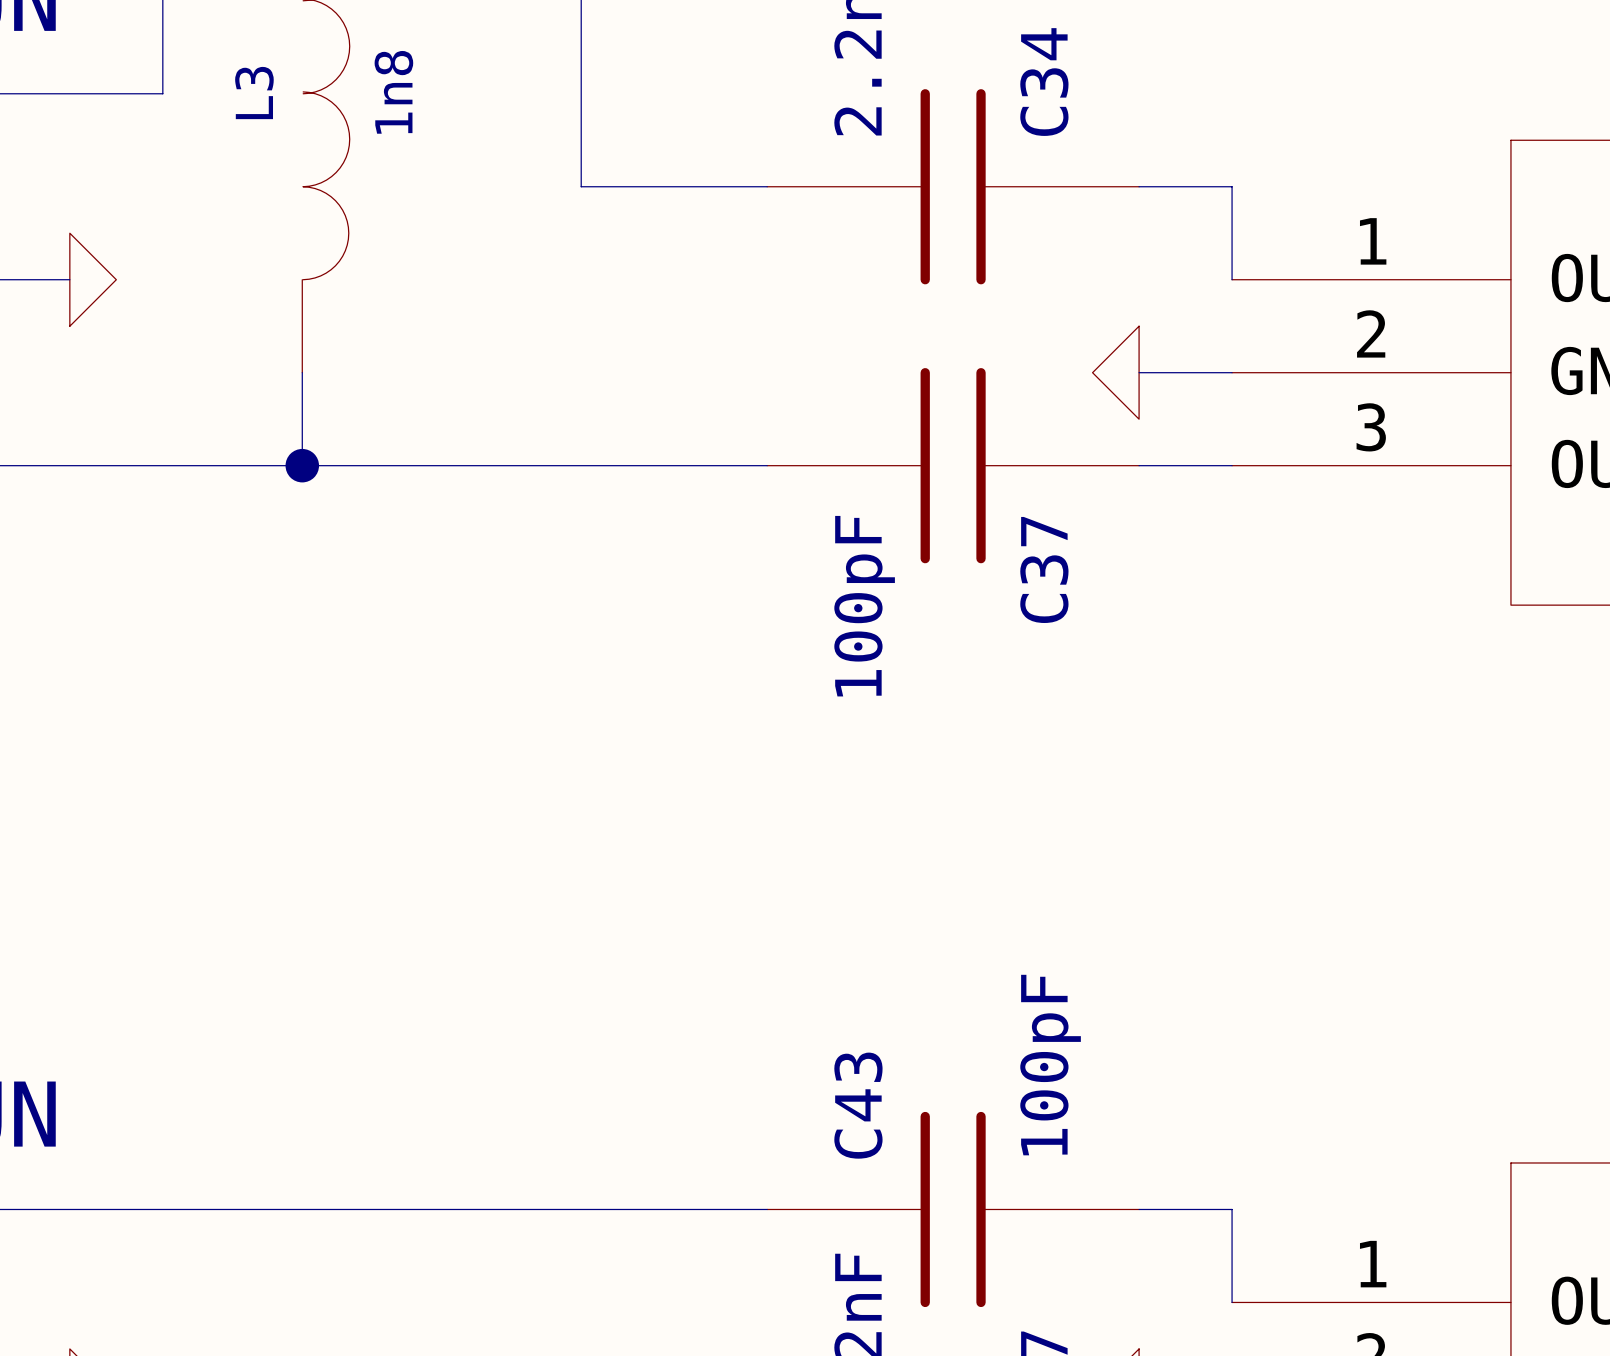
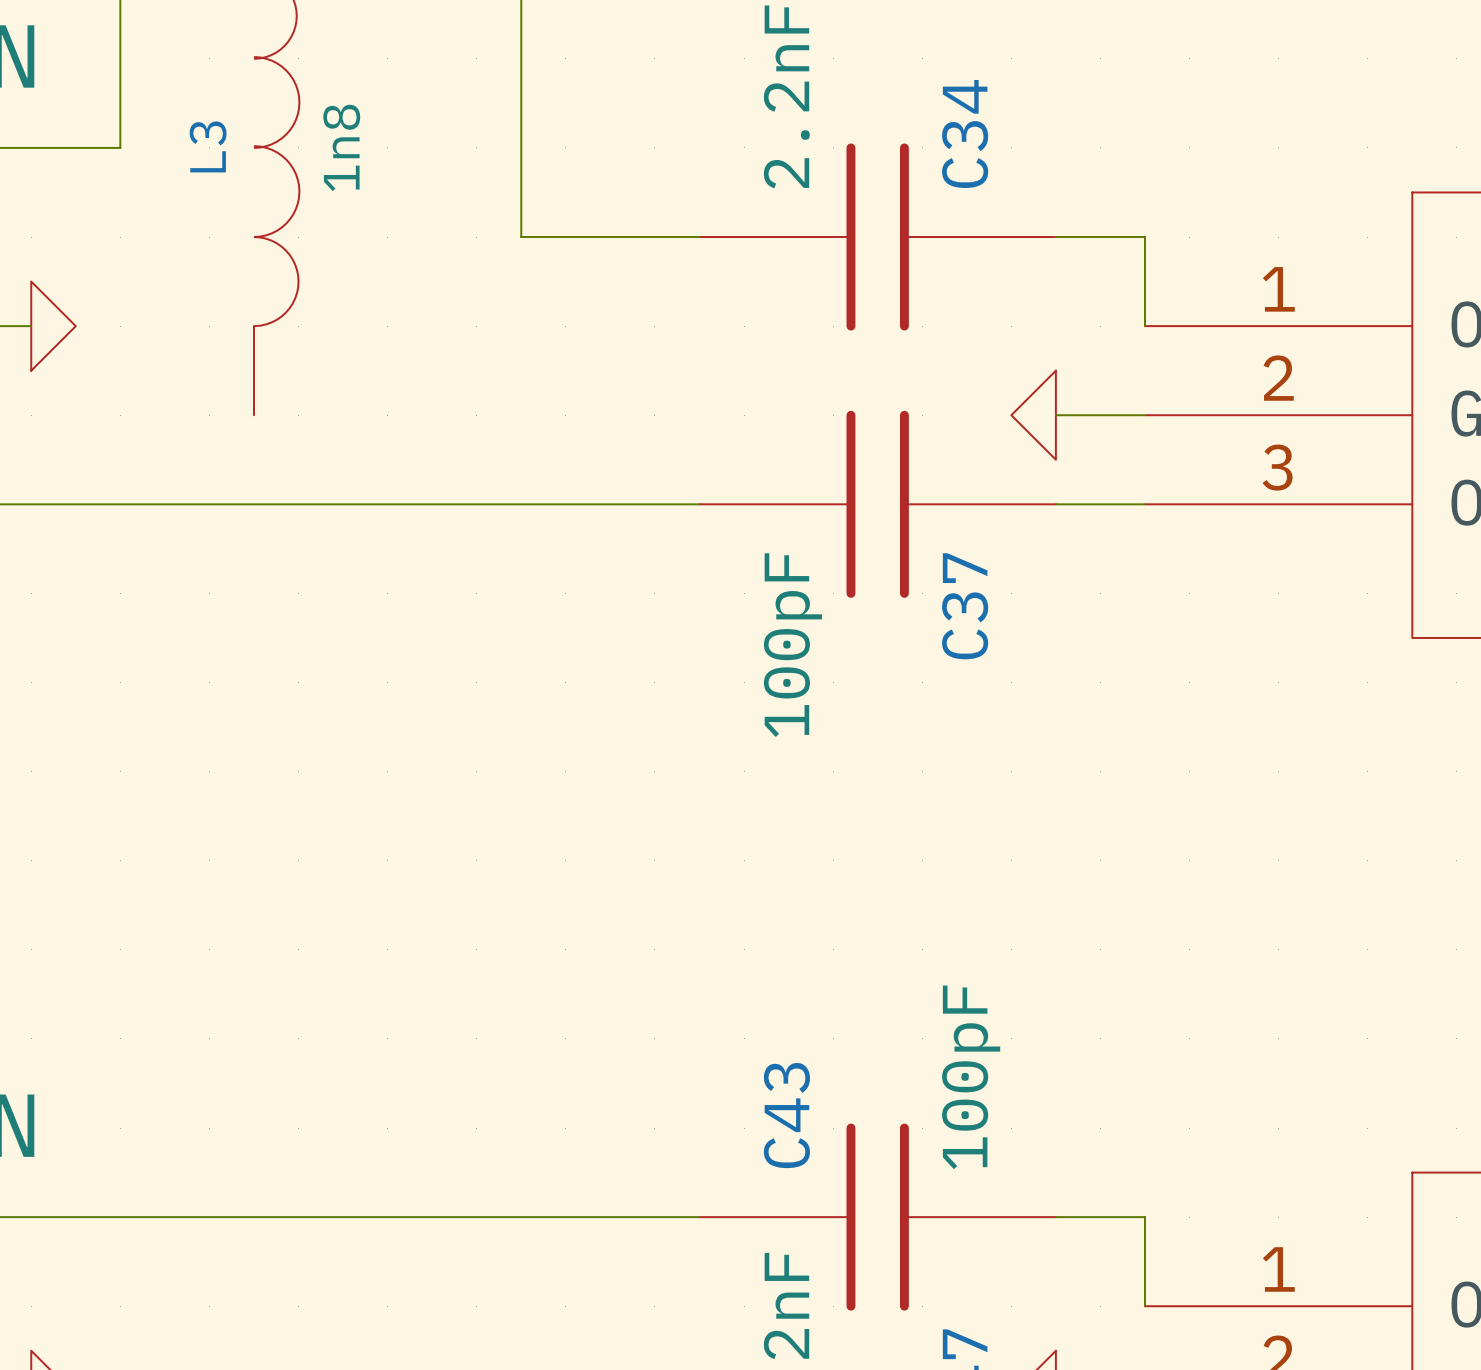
wire: (302, 372) (302, 465) -> none
junction: (302, 465) -> none

